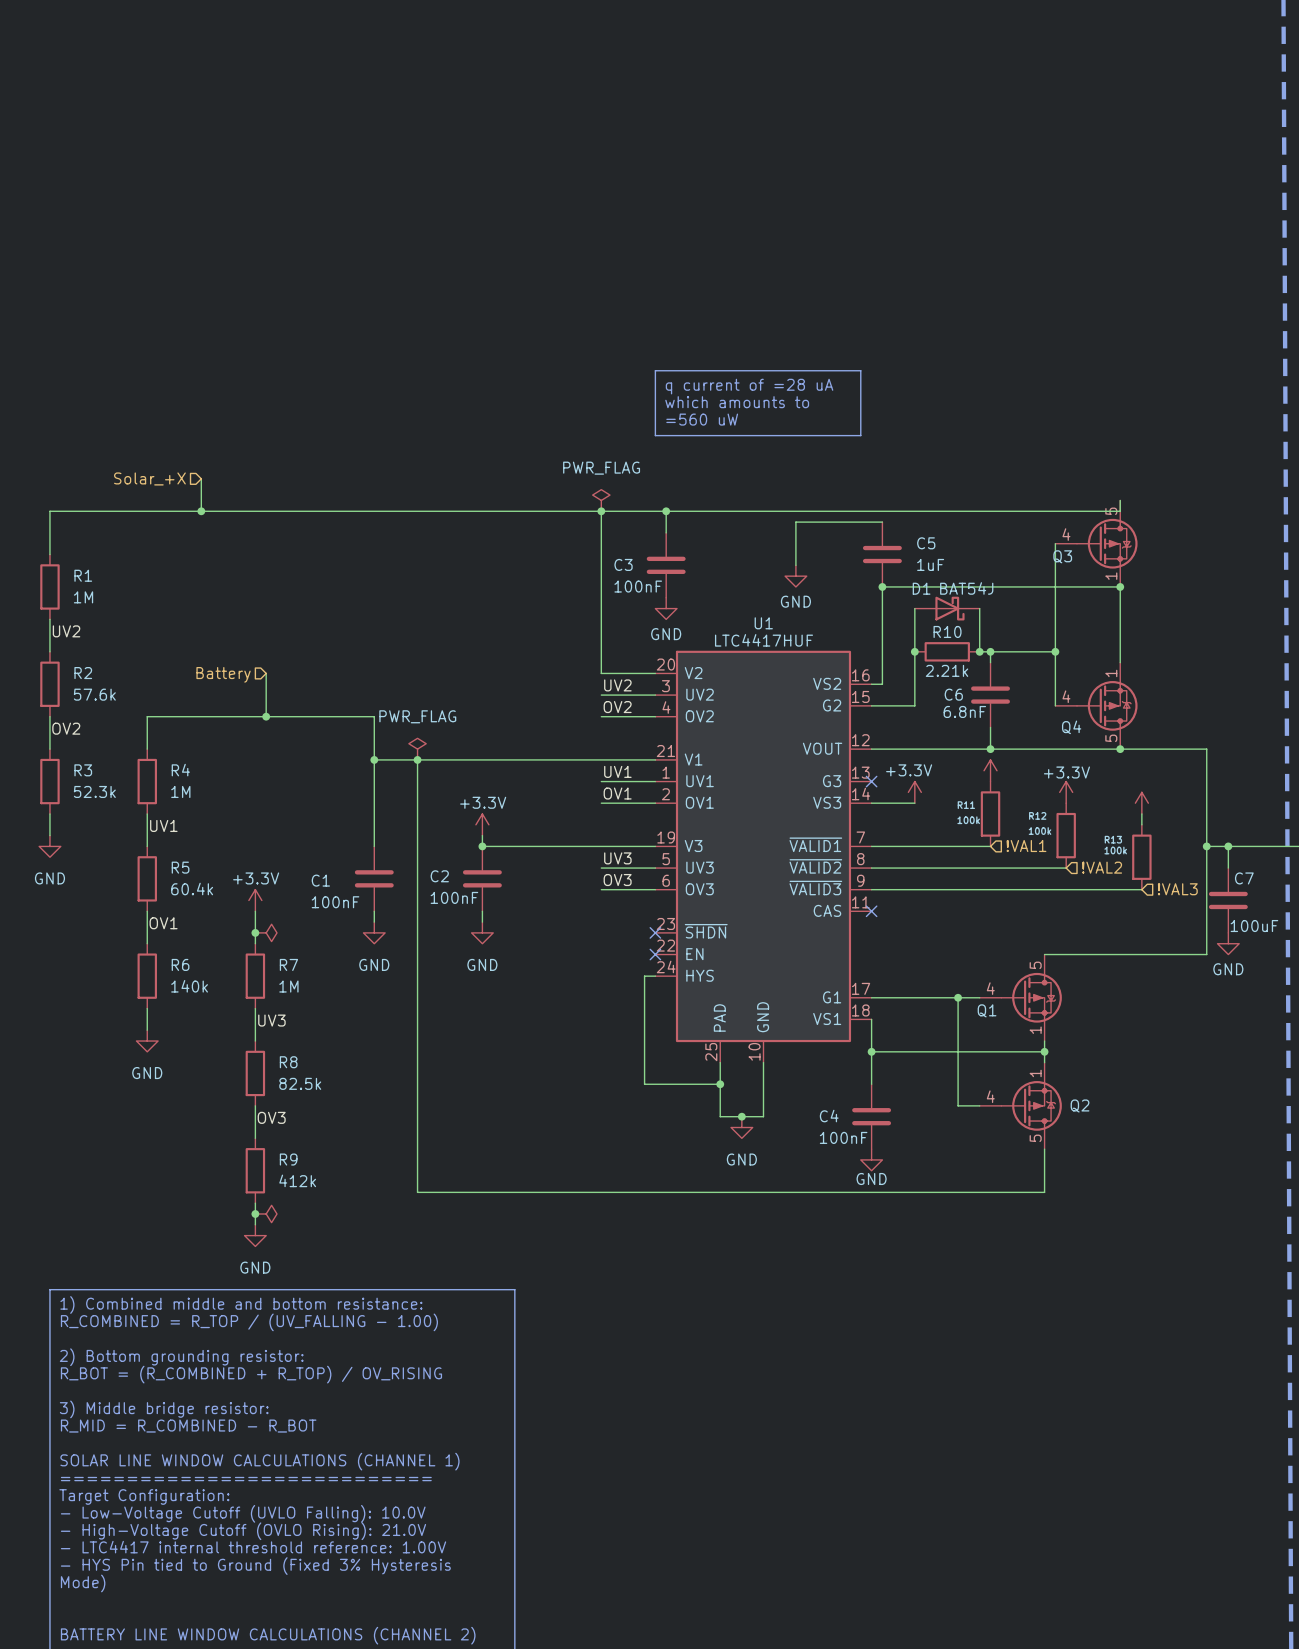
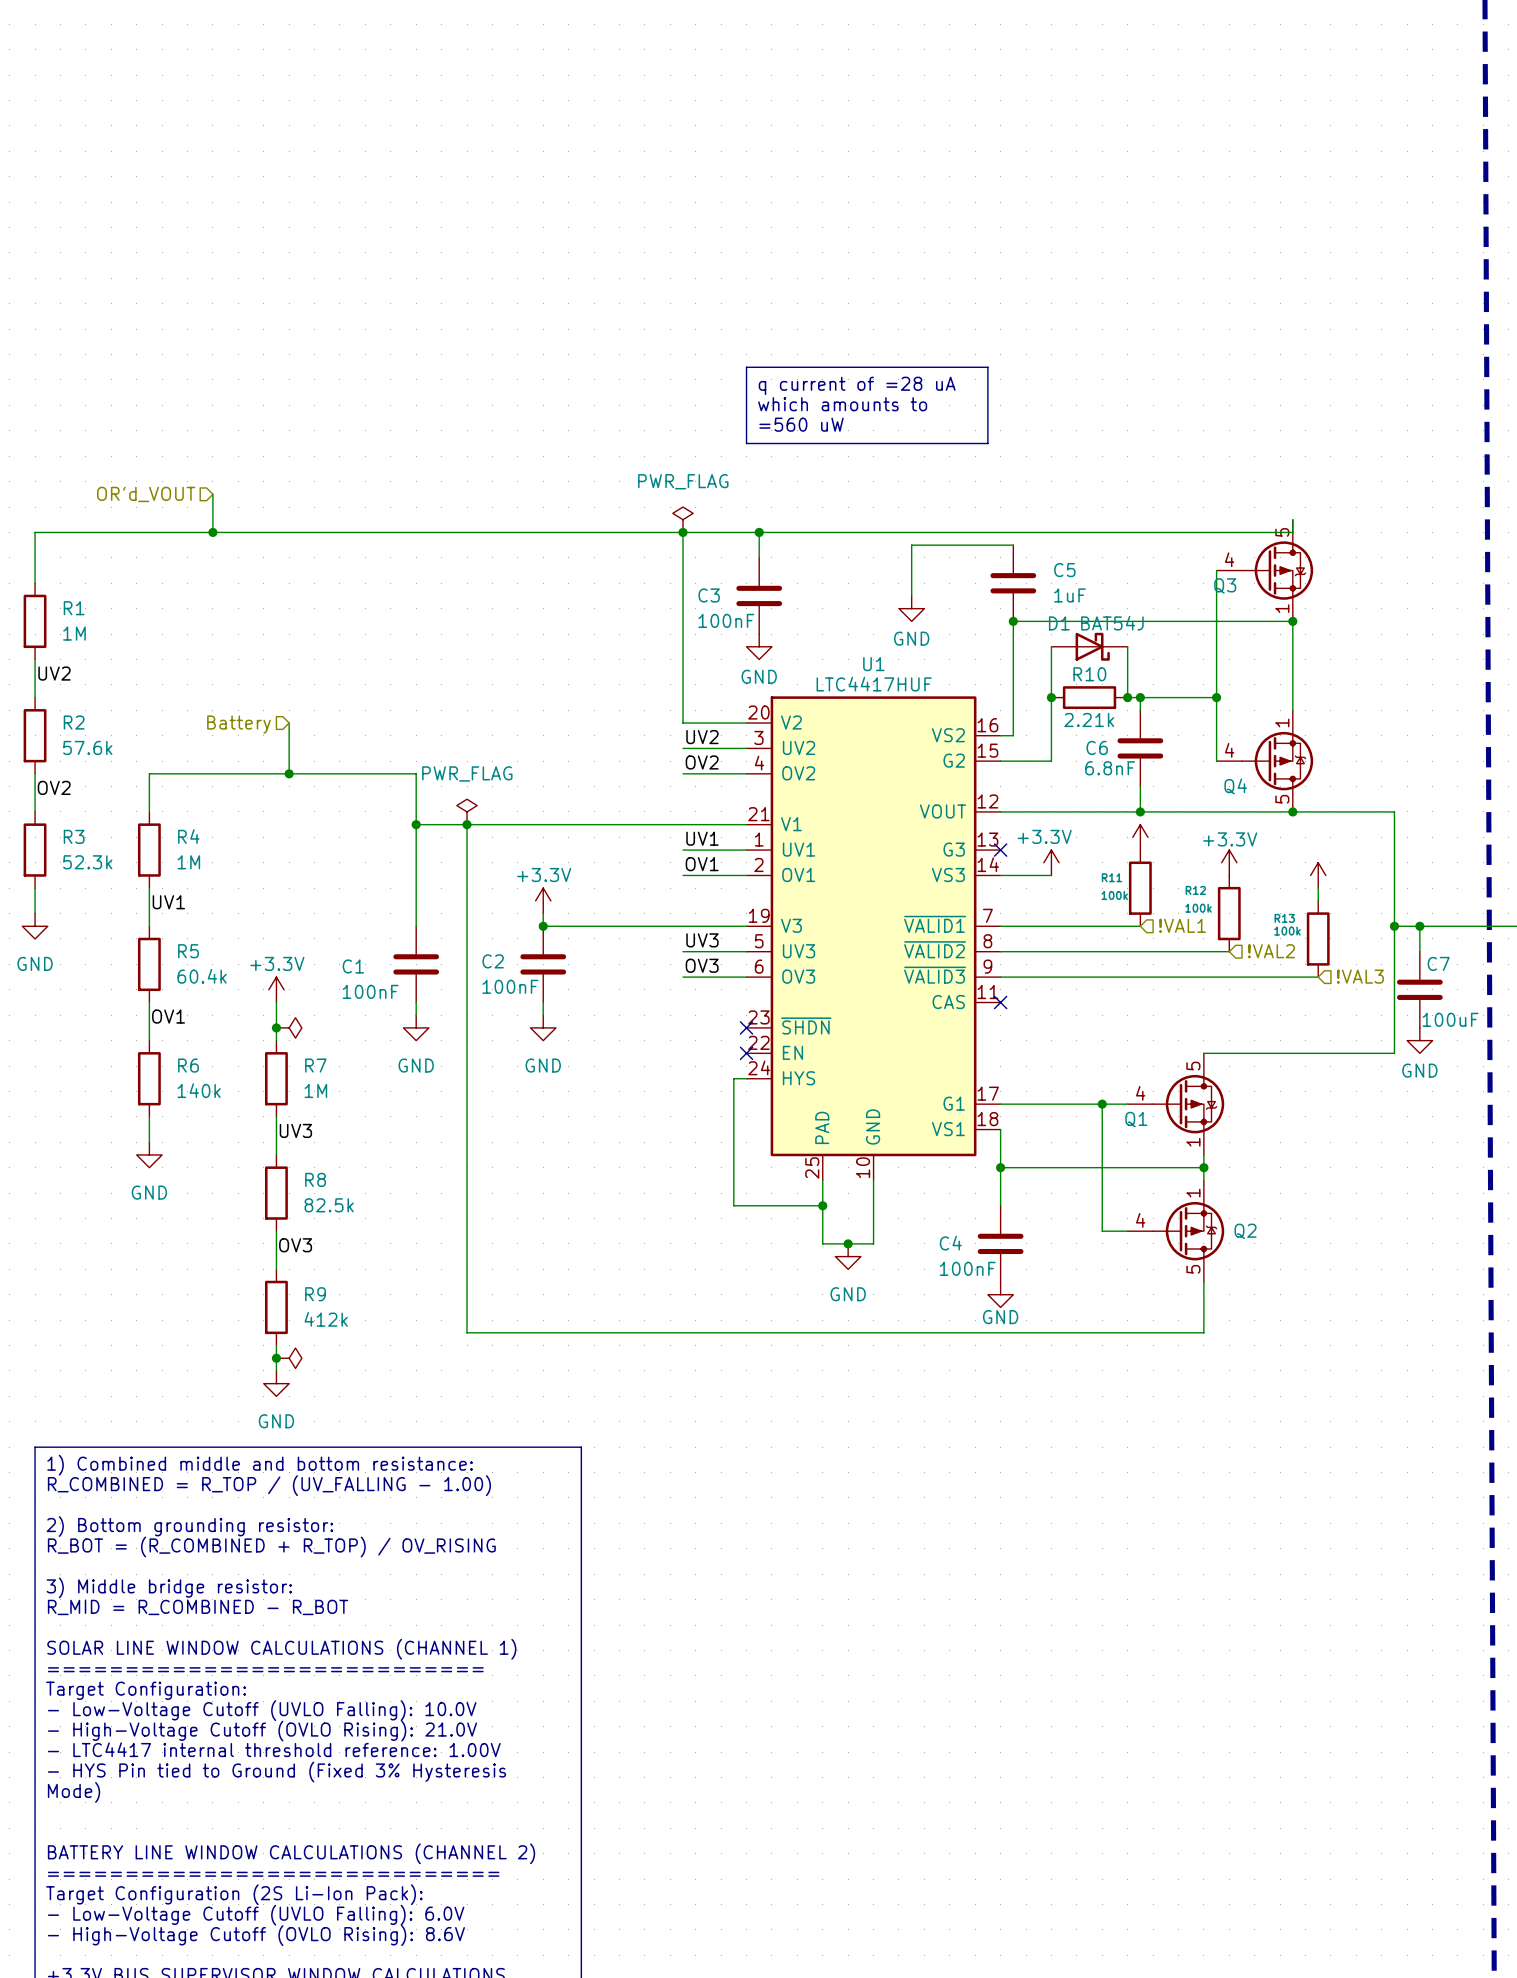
hierarchical label: Solar_+X (149, 478) -> OR'd_VOUT (146, 494)

